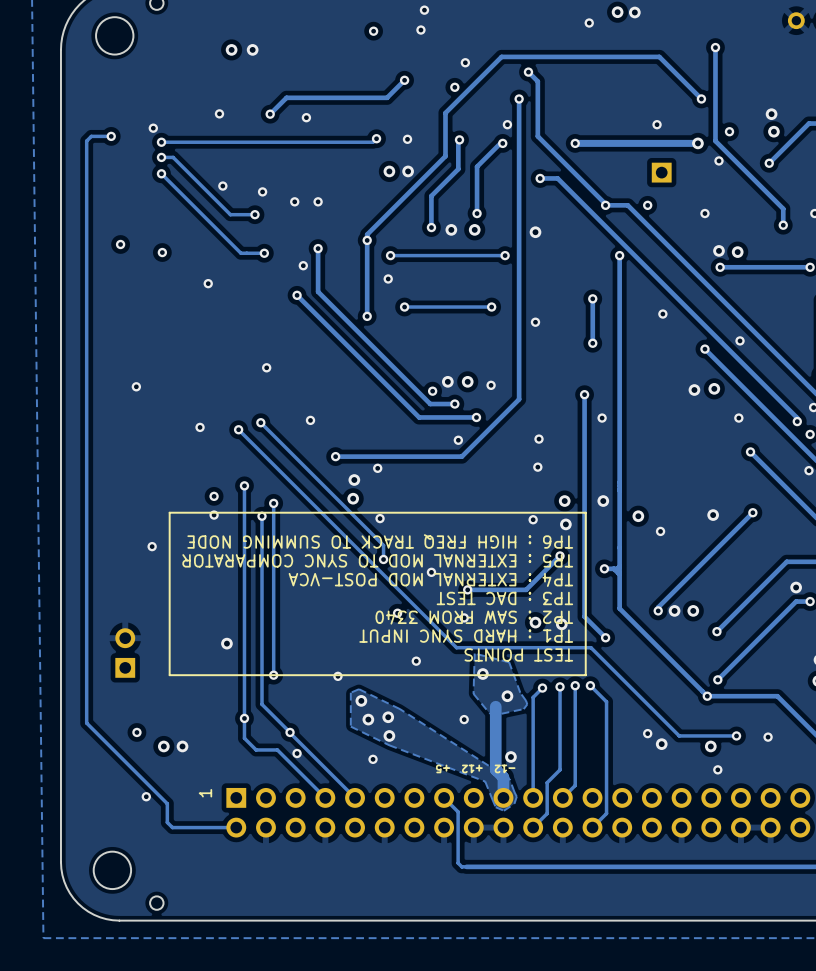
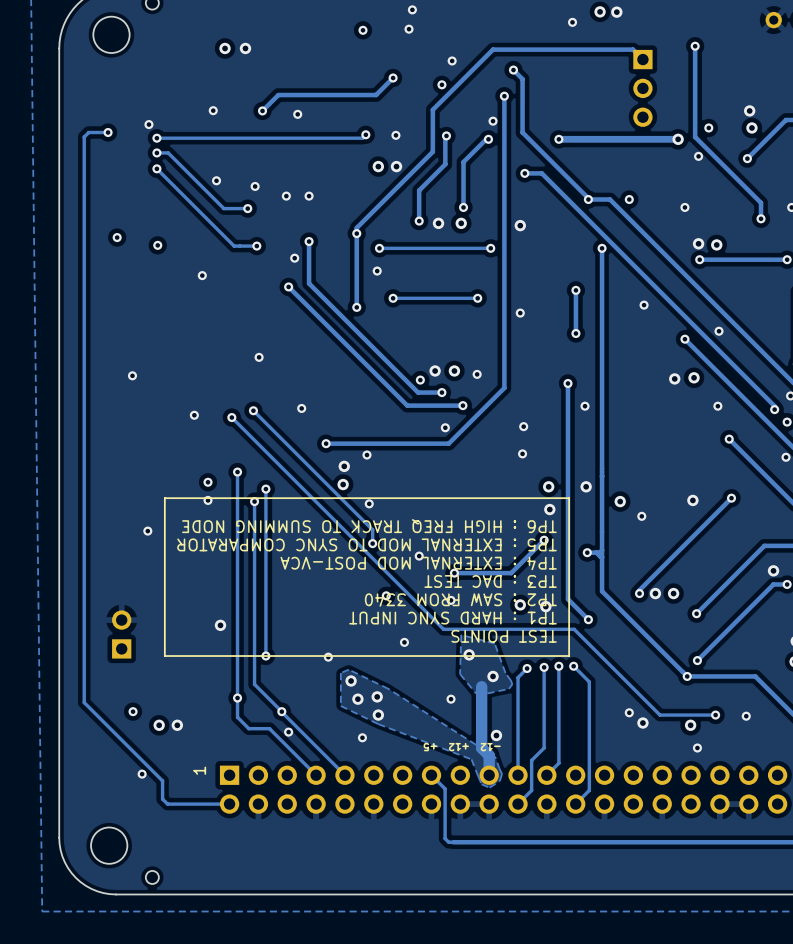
track: (501, 56) (659, 56) (701, 98) -> (487, 55) (493, 49) (632, 49) (642, 59)
part: none -> (642, 88)
via: (701, 98) -> none
via: (657, 124) -> none
part: (661, 172) -> none
via: (533, 519) -> none

